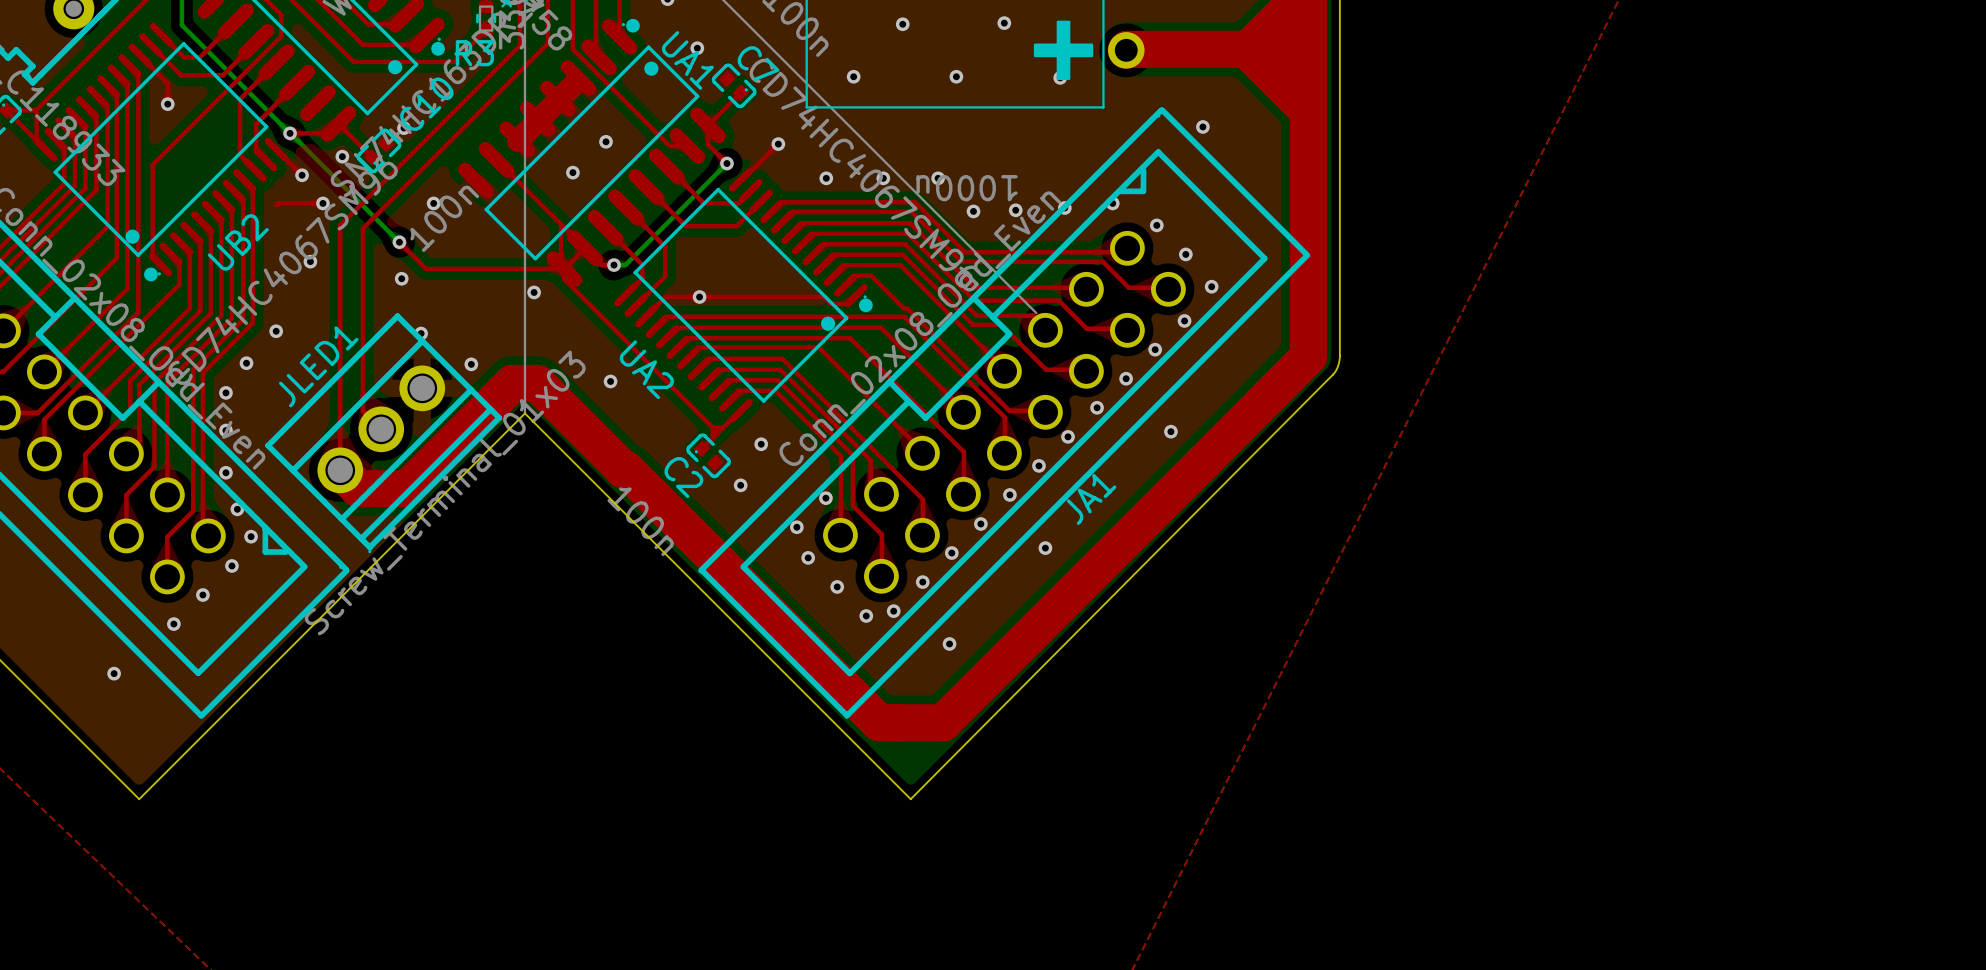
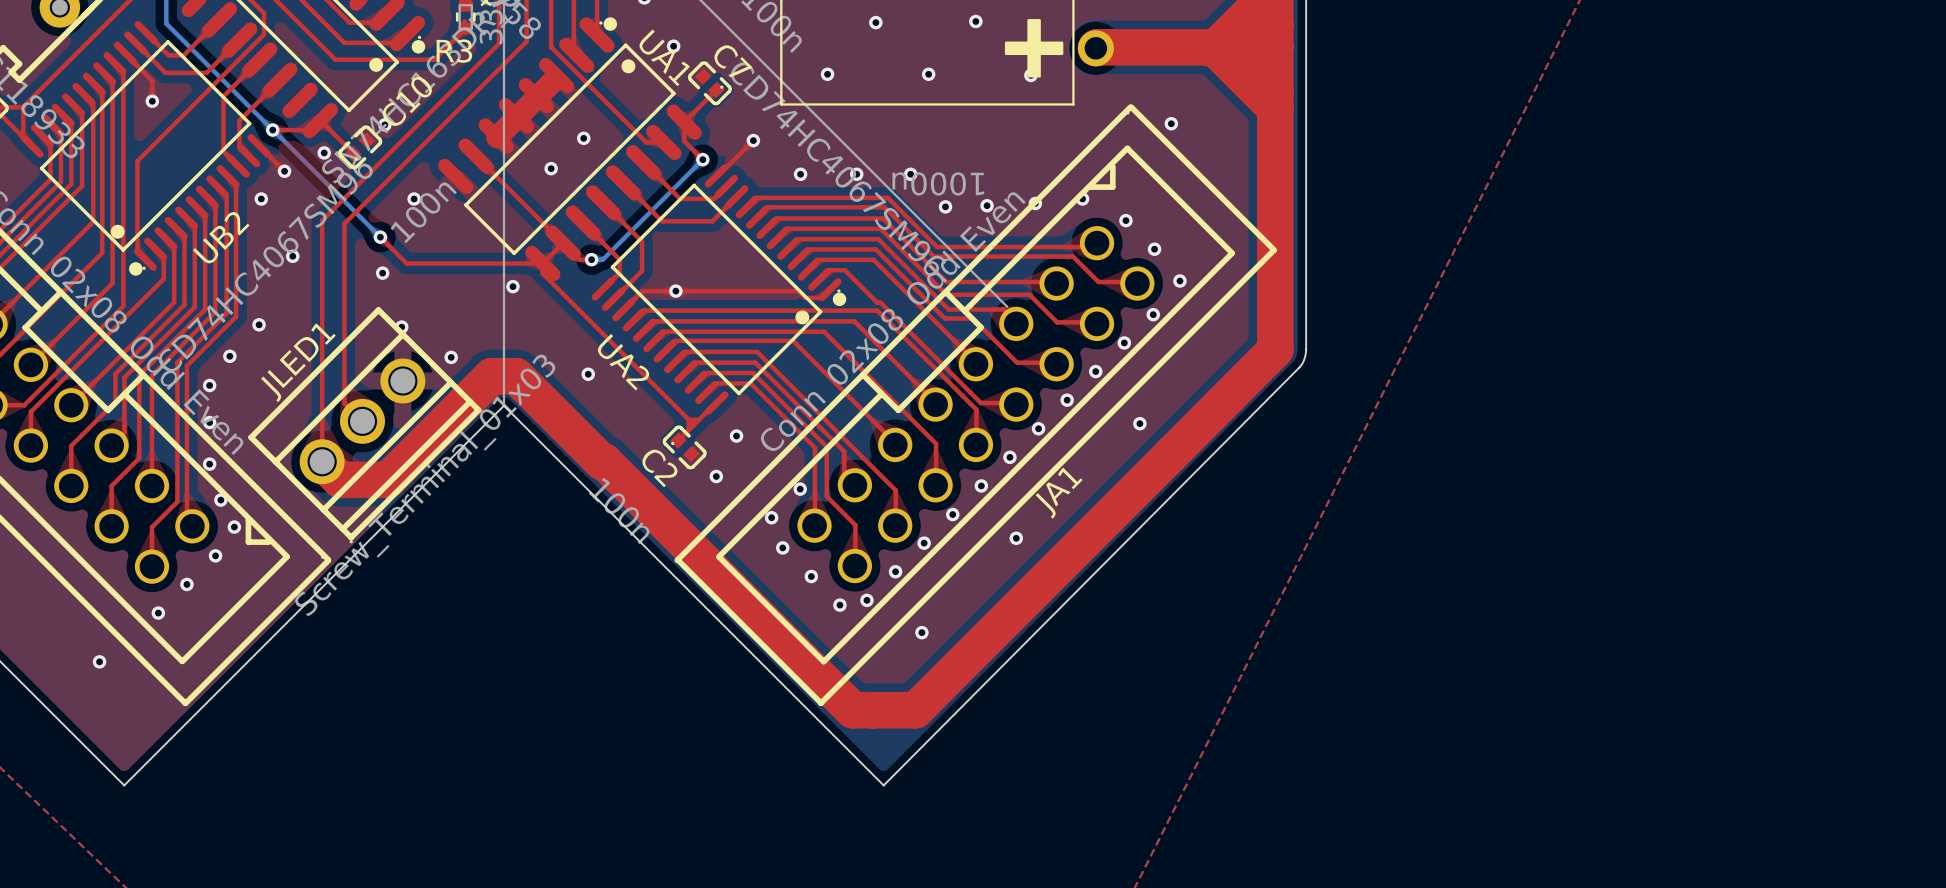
top track: (278, 203) (322, 203) -> none
via position: (322, 203) -> (261, 199)
top track: (561, 224) (561, 258) (550, 268) -> none

